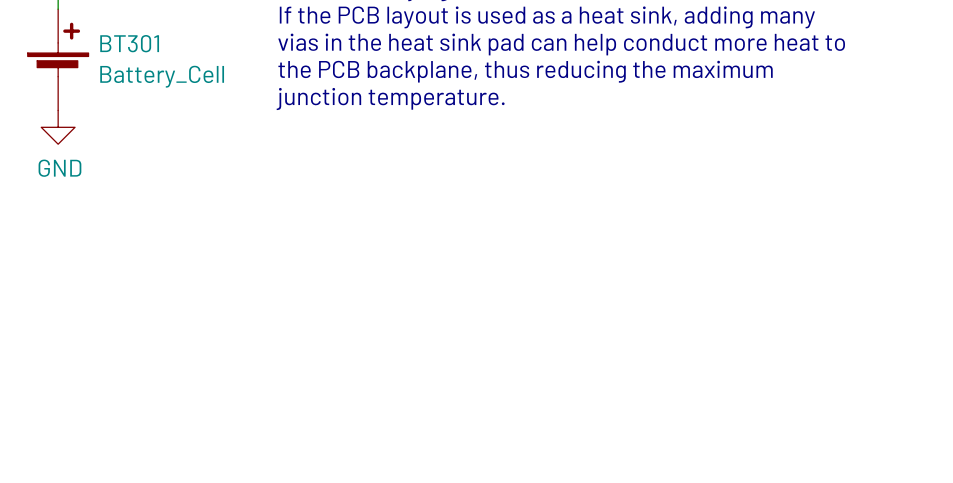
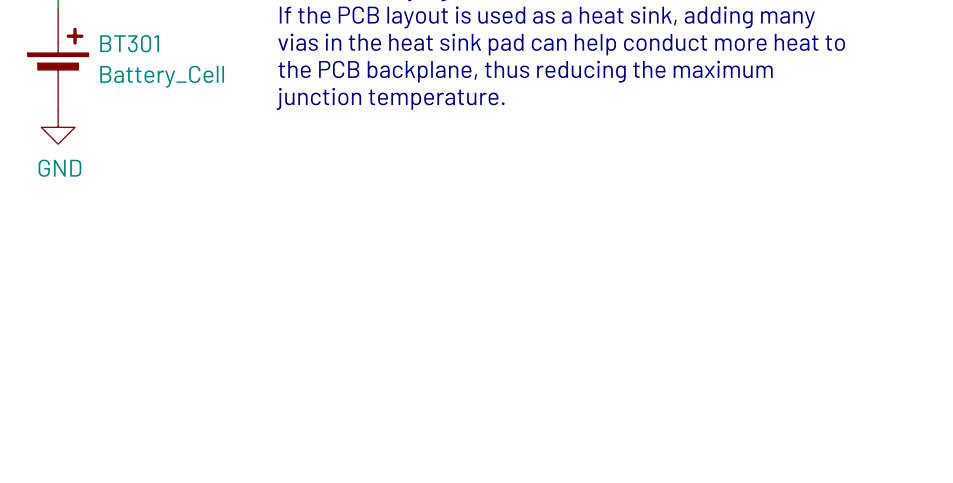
BT301 symbol: [27, 9, 89, 111] -> [27, 9, 89, 111]

